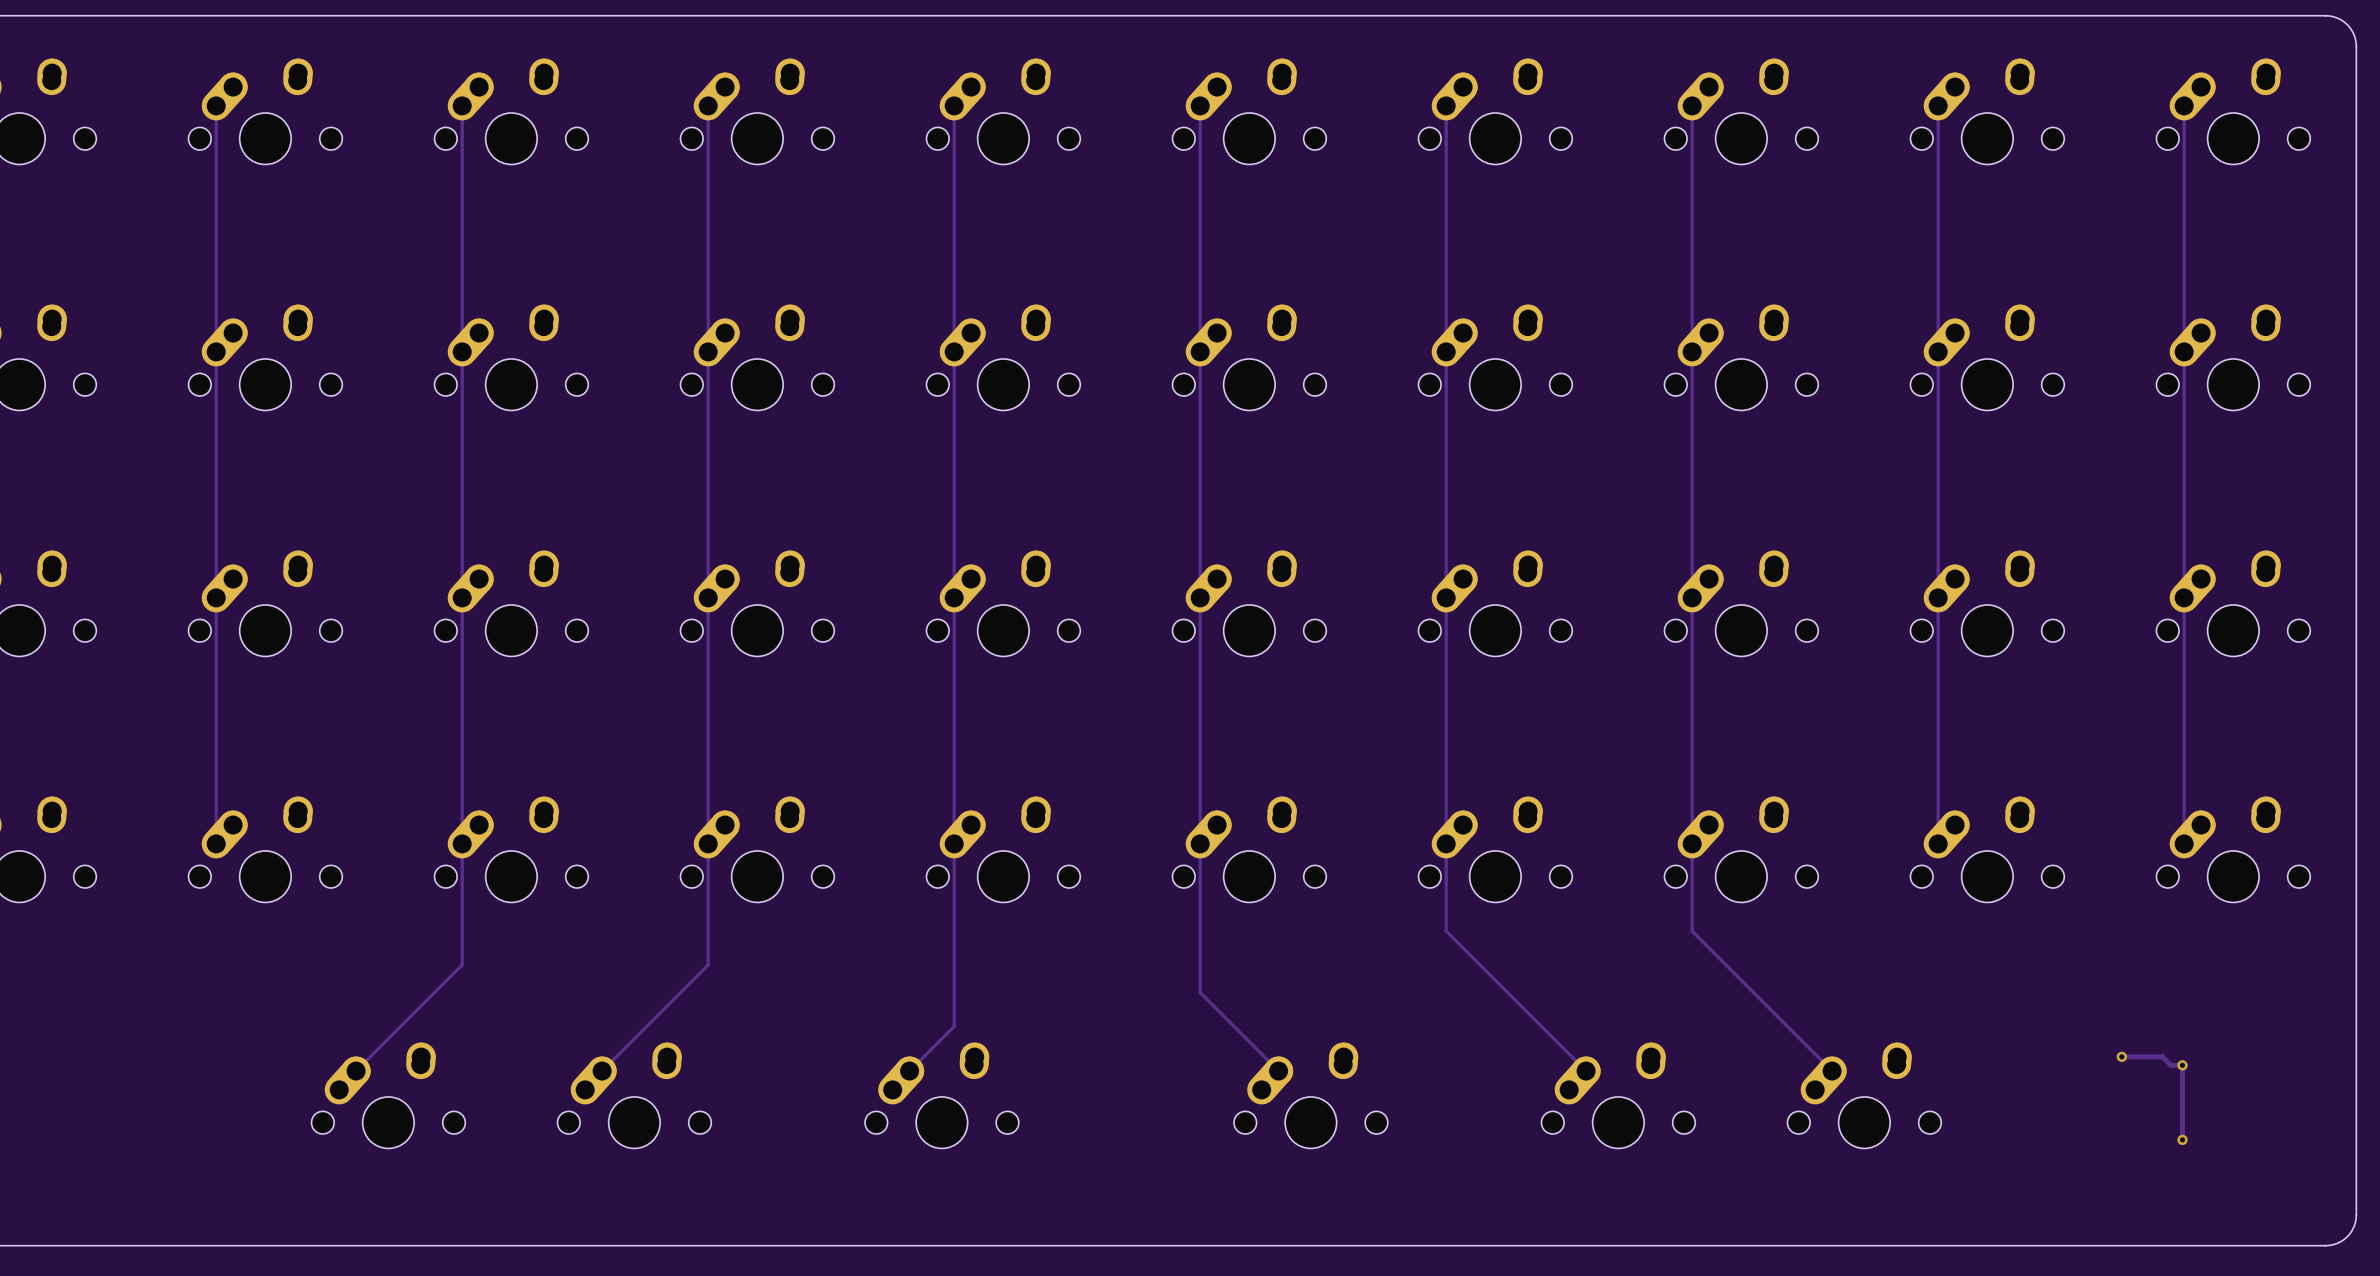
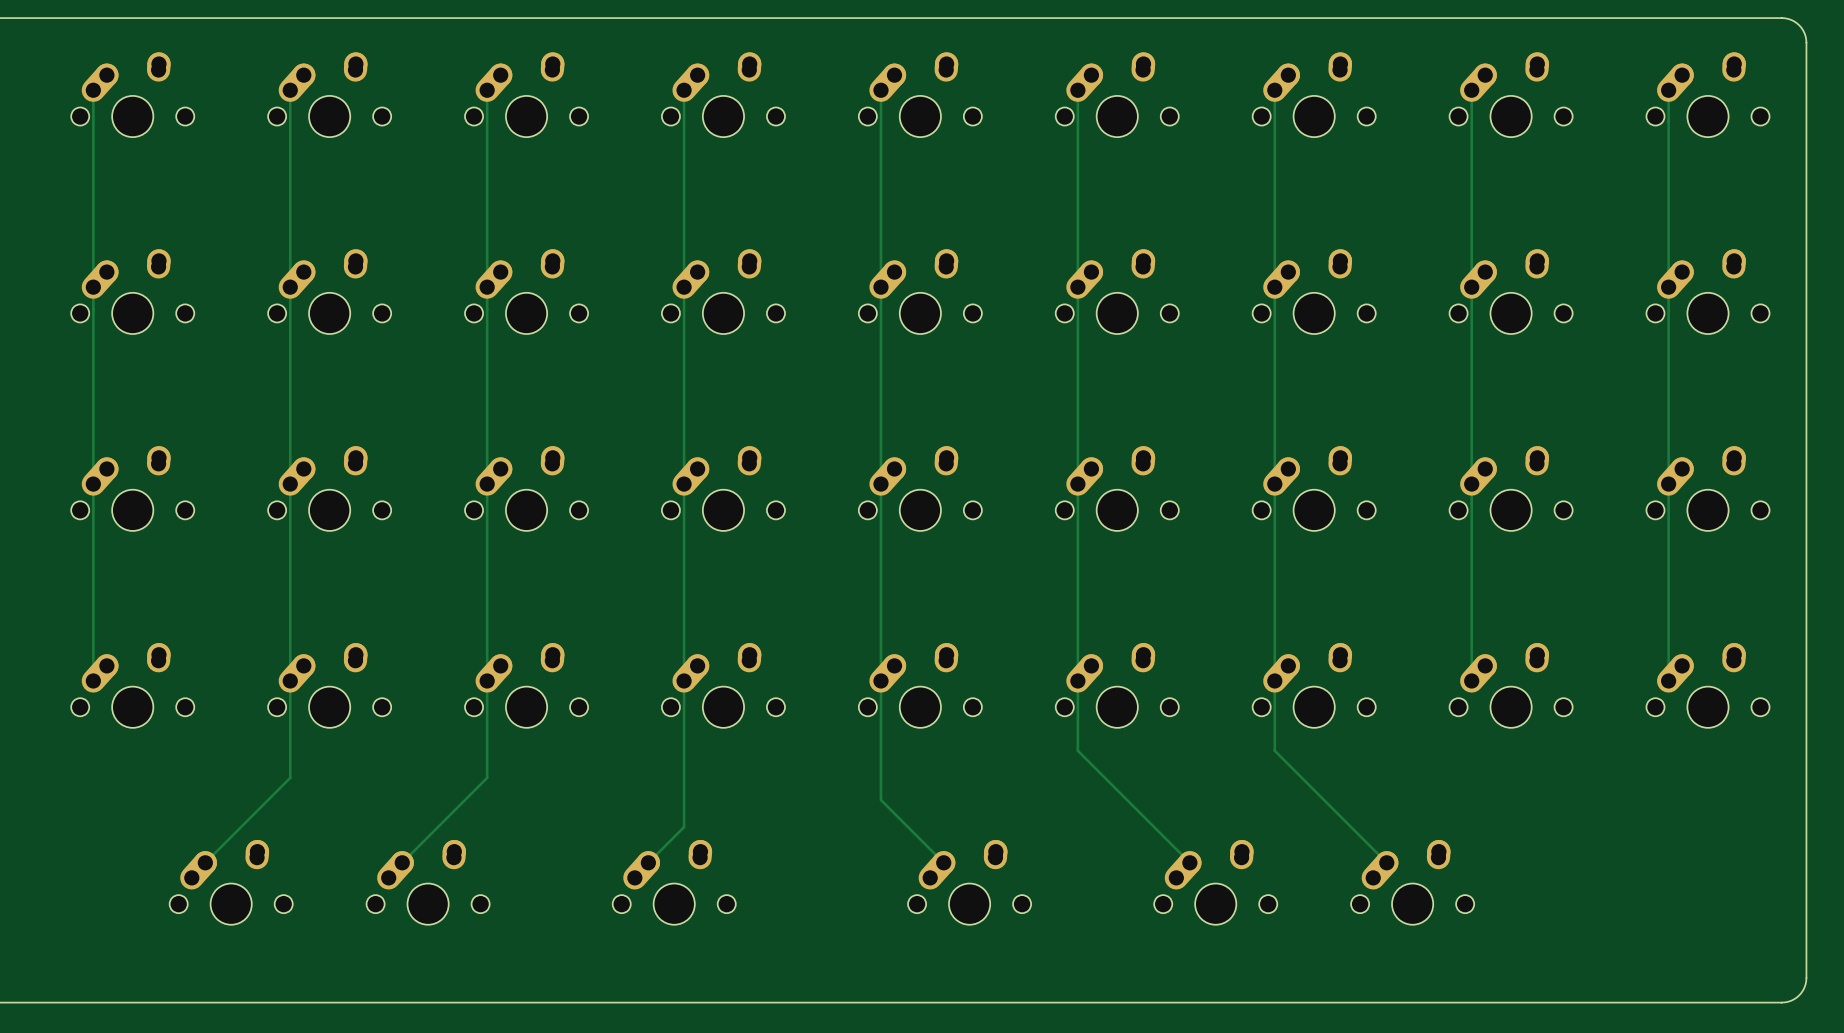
track: (2121, 1056) (2162, 1056) (2171, 1065) (2182, 1065) (2182, 1139) -> none
via: (2121, 1056) -> none
via: (2182, 1065) -> none
via: (2182, 1139) -> none

